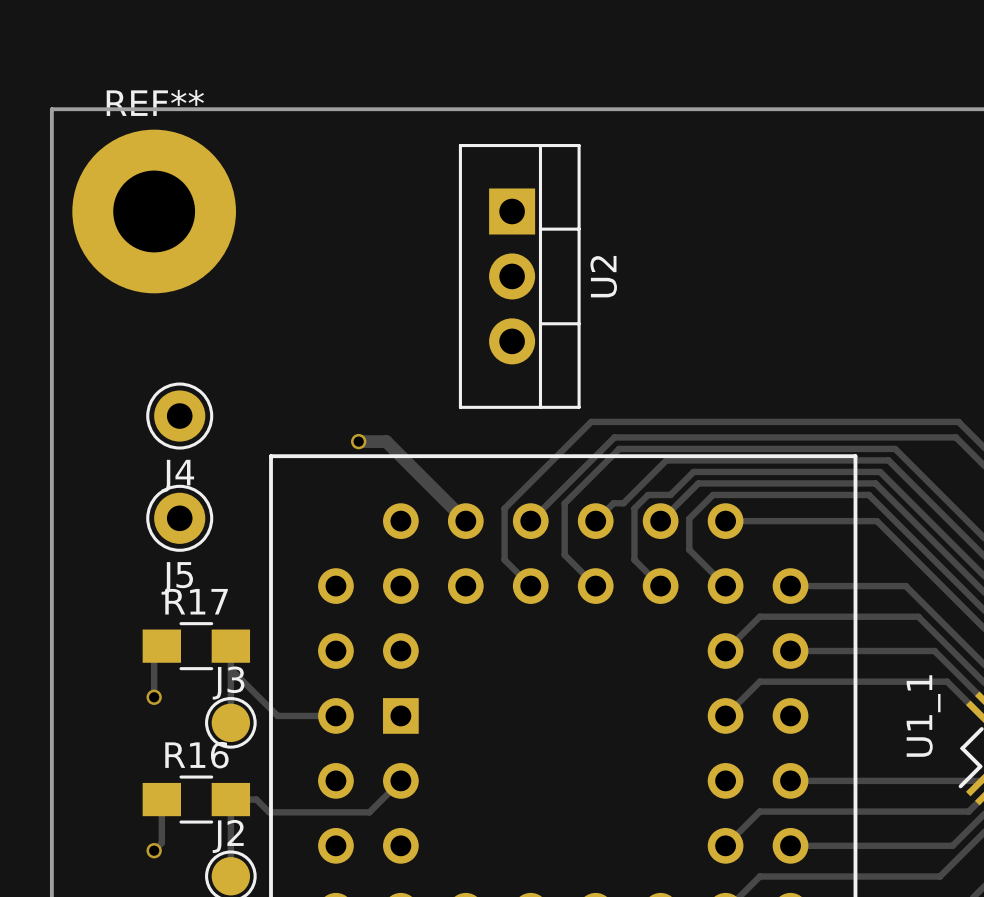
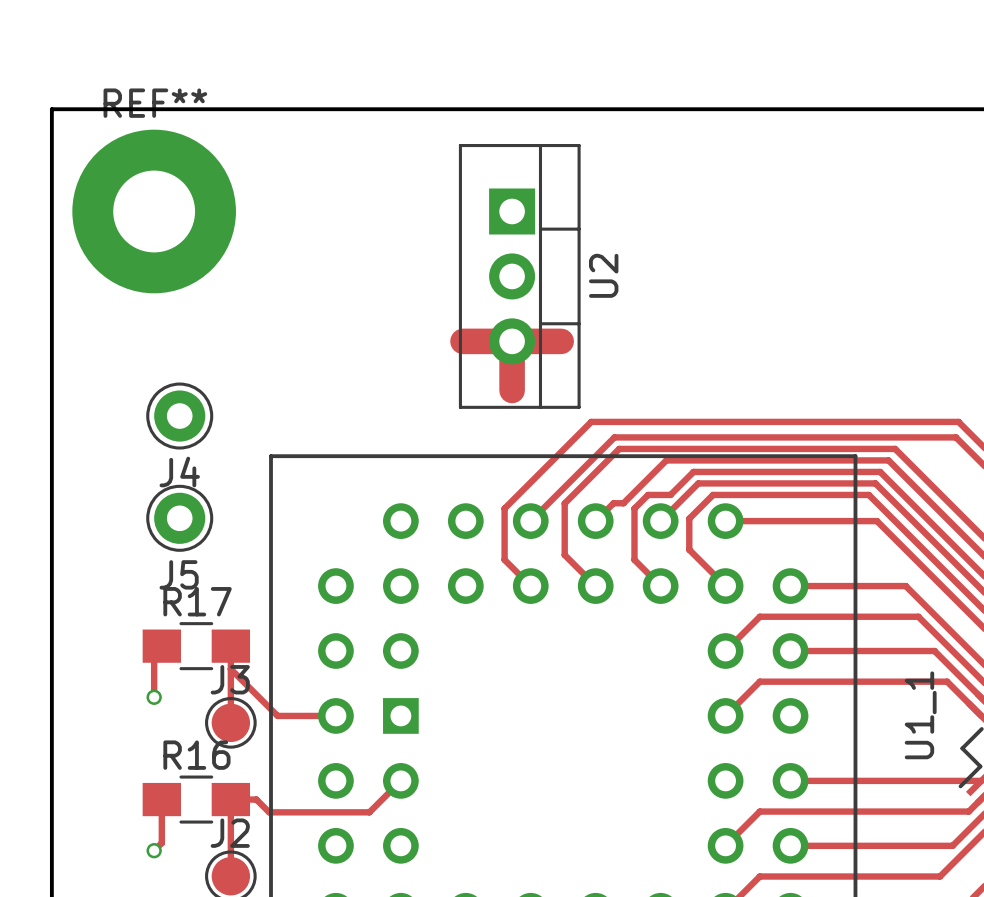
track: none -> (463, 341) (561, 341)
track: none -> (512, 341) (512, 390)
track: (358, 441) (386, 441) (465, 521) -> none
via: (358, 441) -> none

